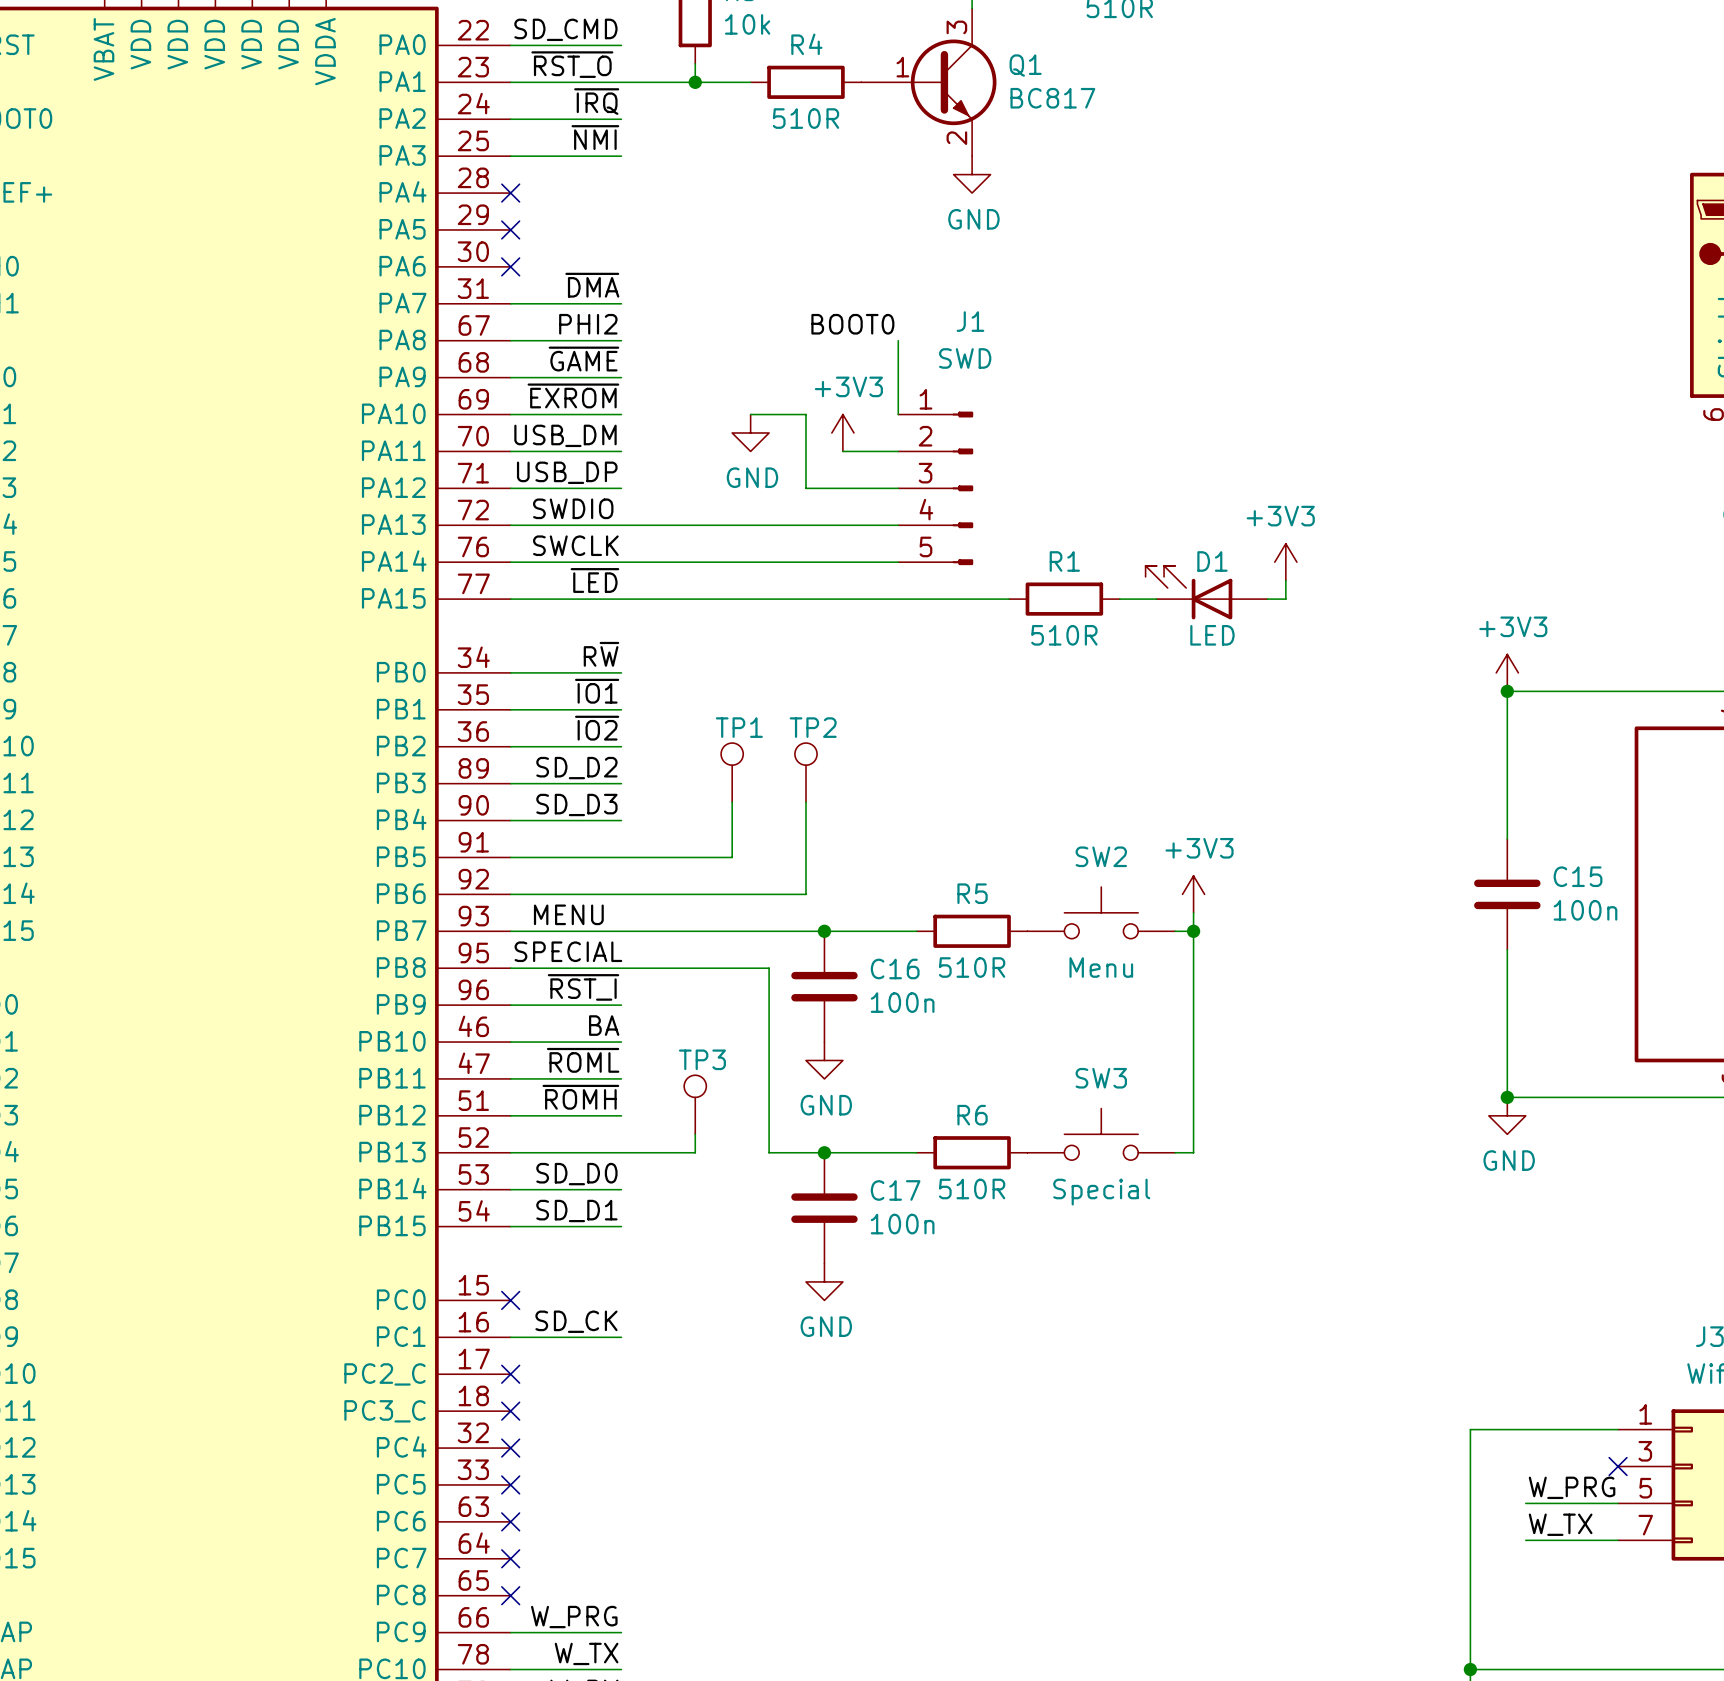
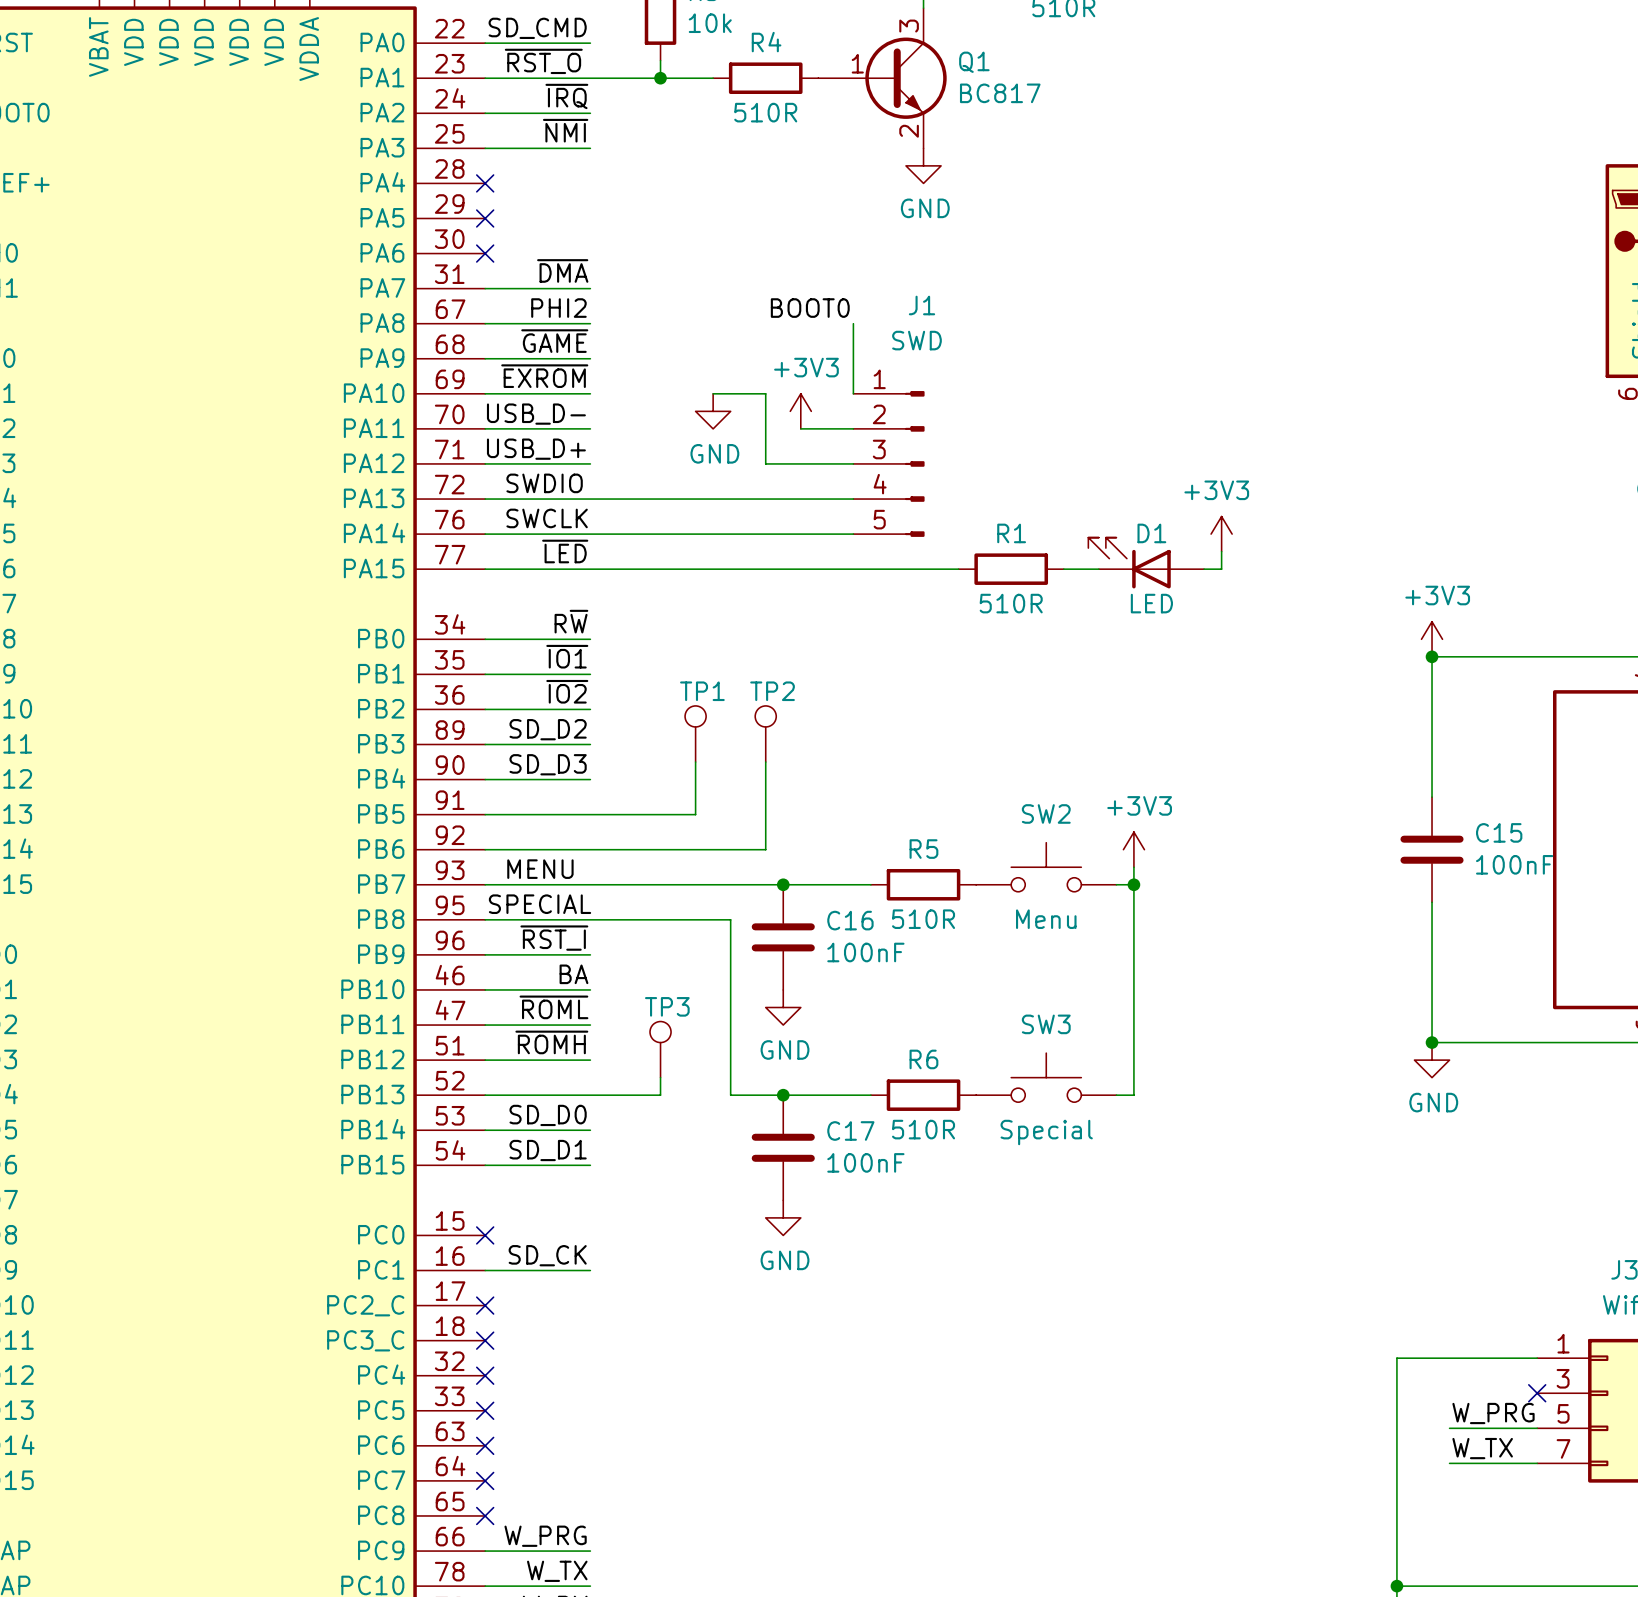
label: USB_DM (565, 435) -> USB_D- (536, 414)
label: USB_DP (567, 472) -> USB_D+ (536, 449)
C15 value: 100n (1585, 910) -> 100nF (1514, 864)
C16 value: 100n (902, 1002) -> 100nF (865, 952)
C17 value: 100n (902, 1224) -> 100nF (865, 1162)

